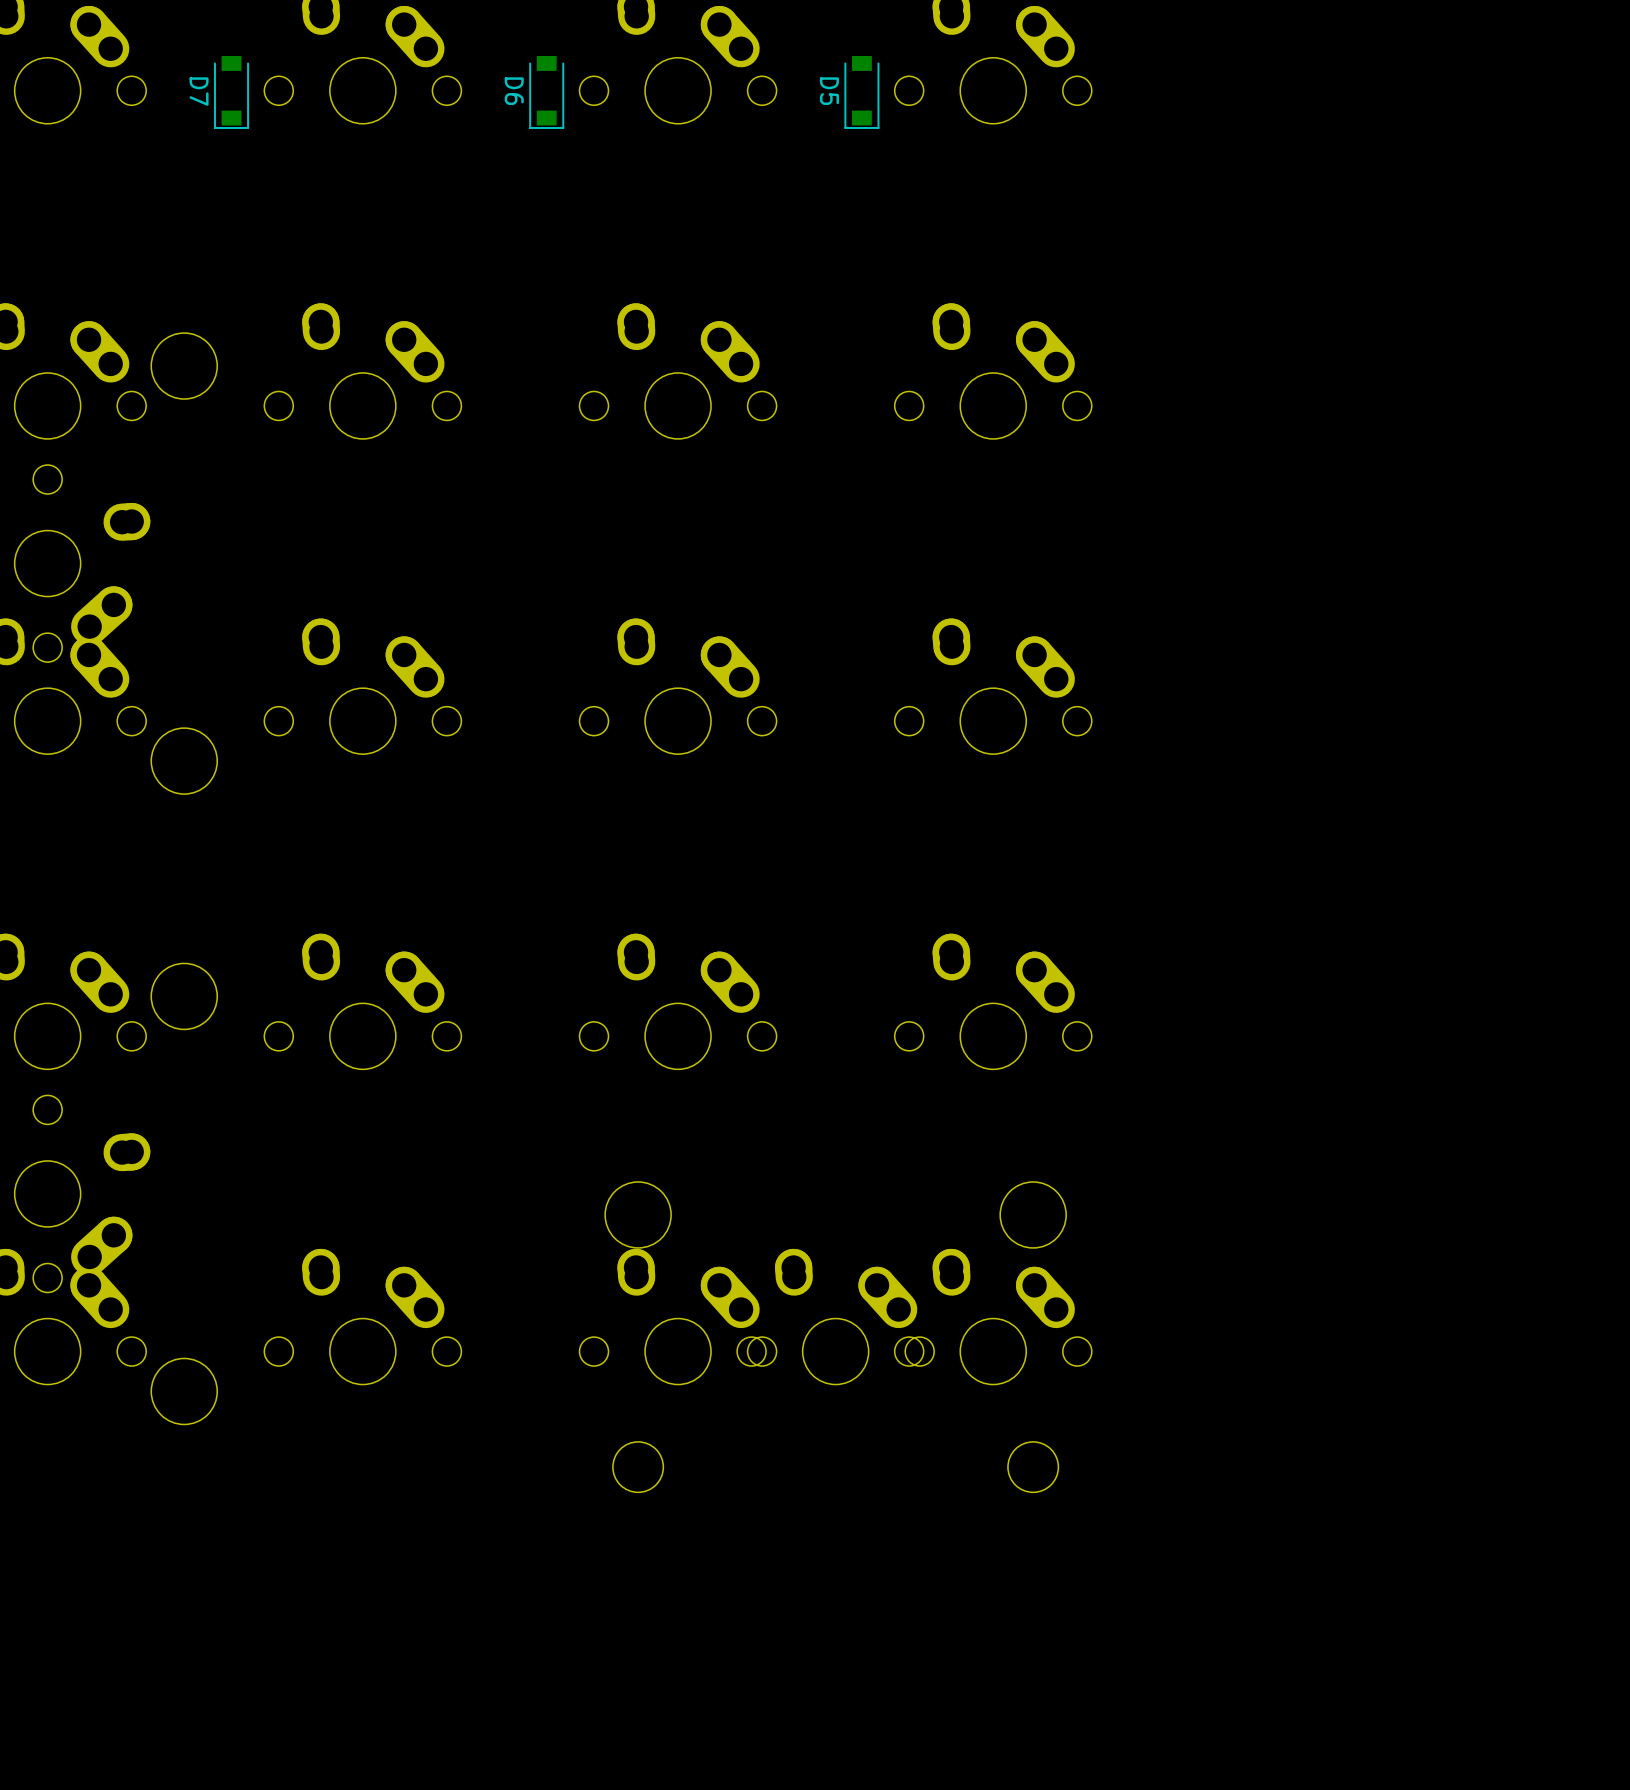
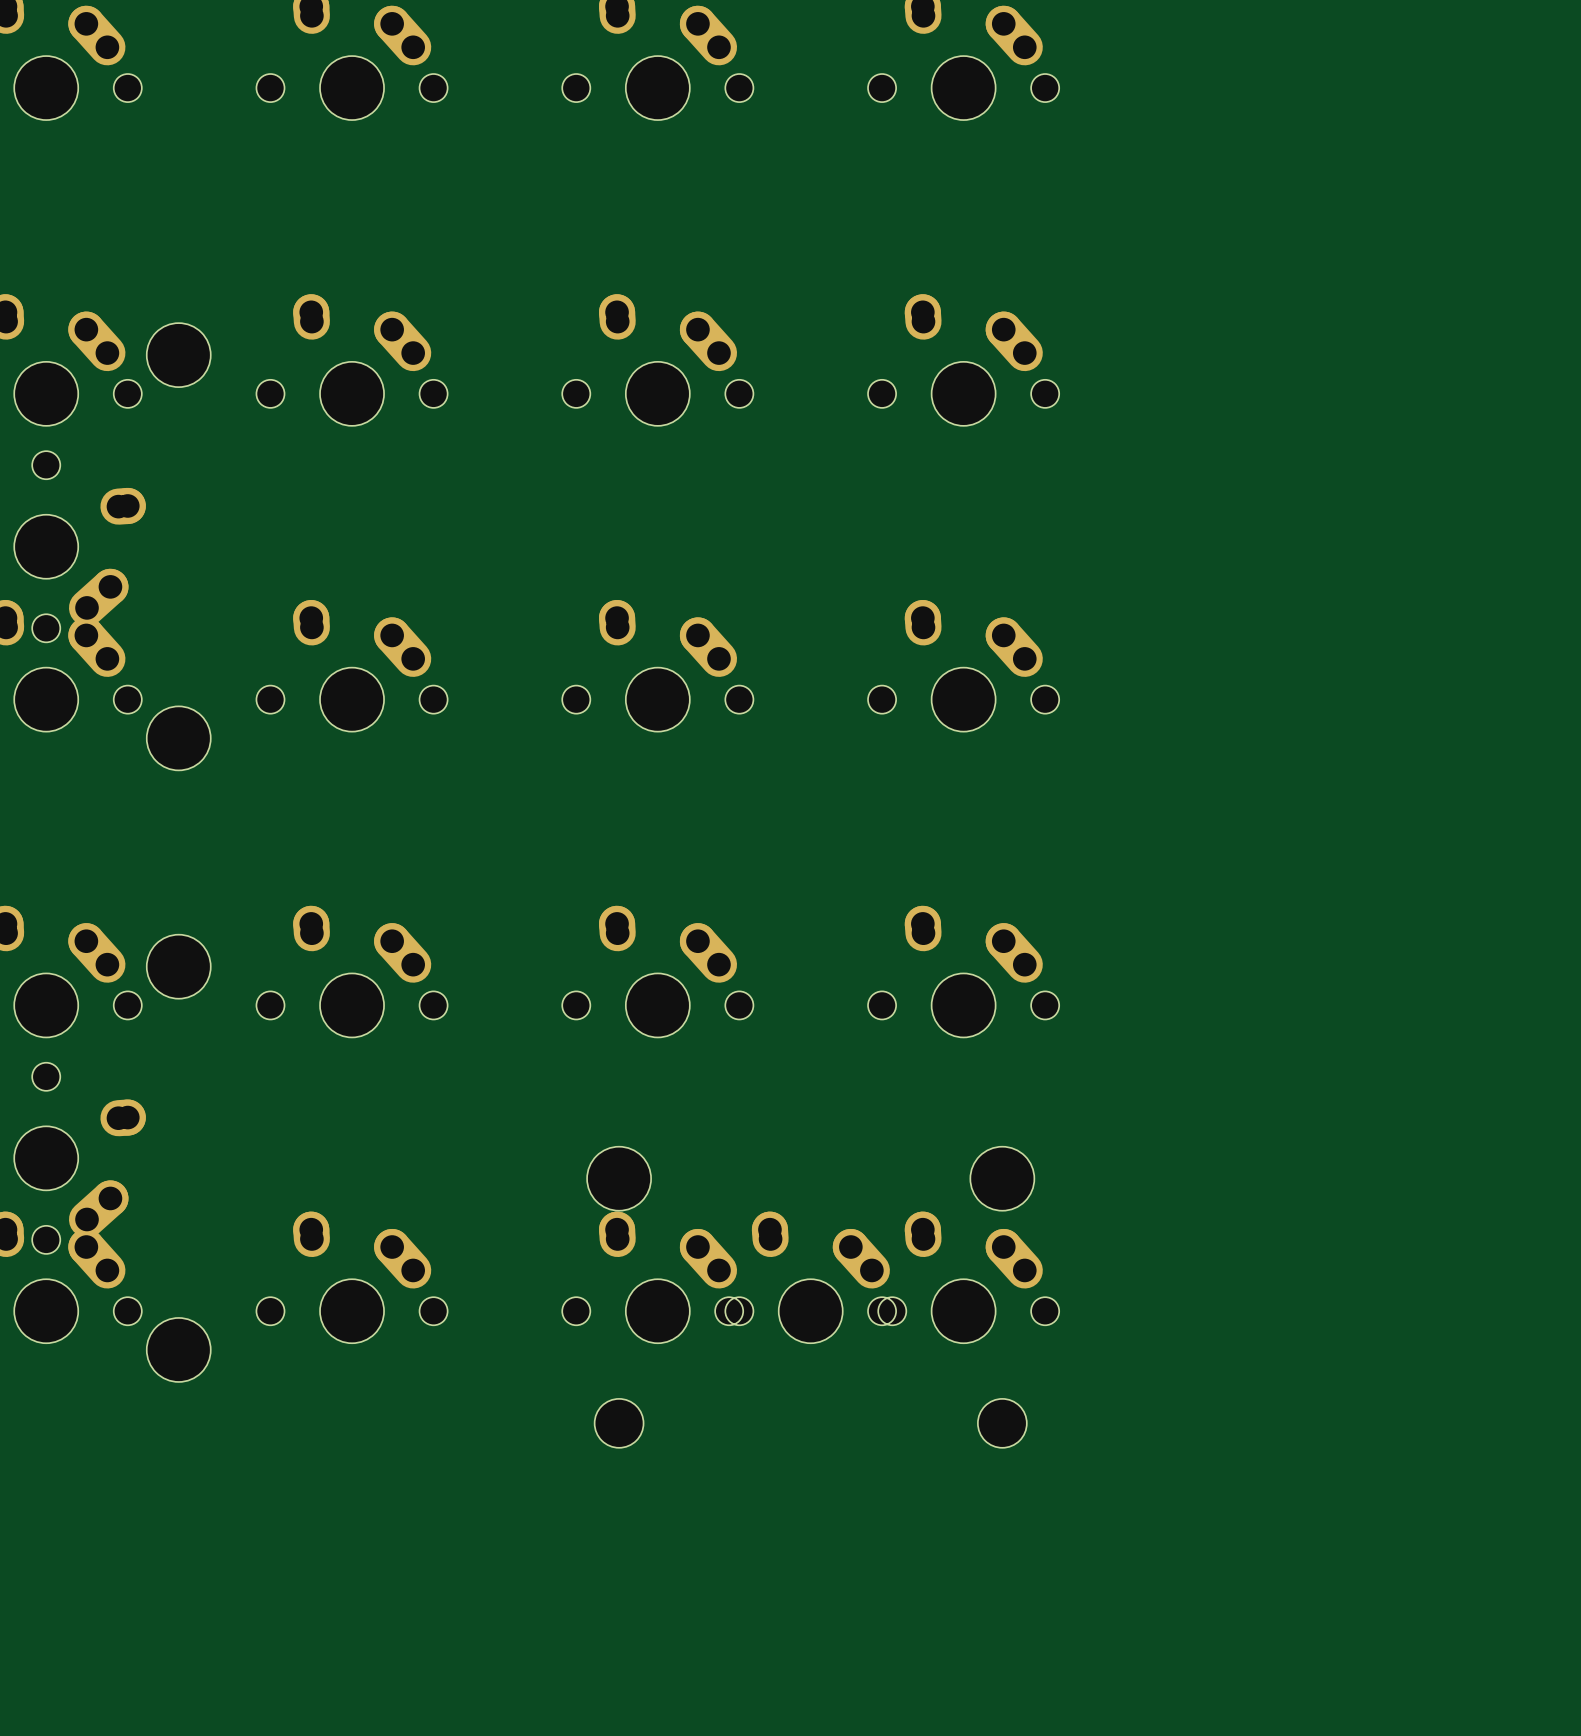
D7: (231, 92) -> none
D6: (546, 92) -> none
D5: (861, 92) -> none

